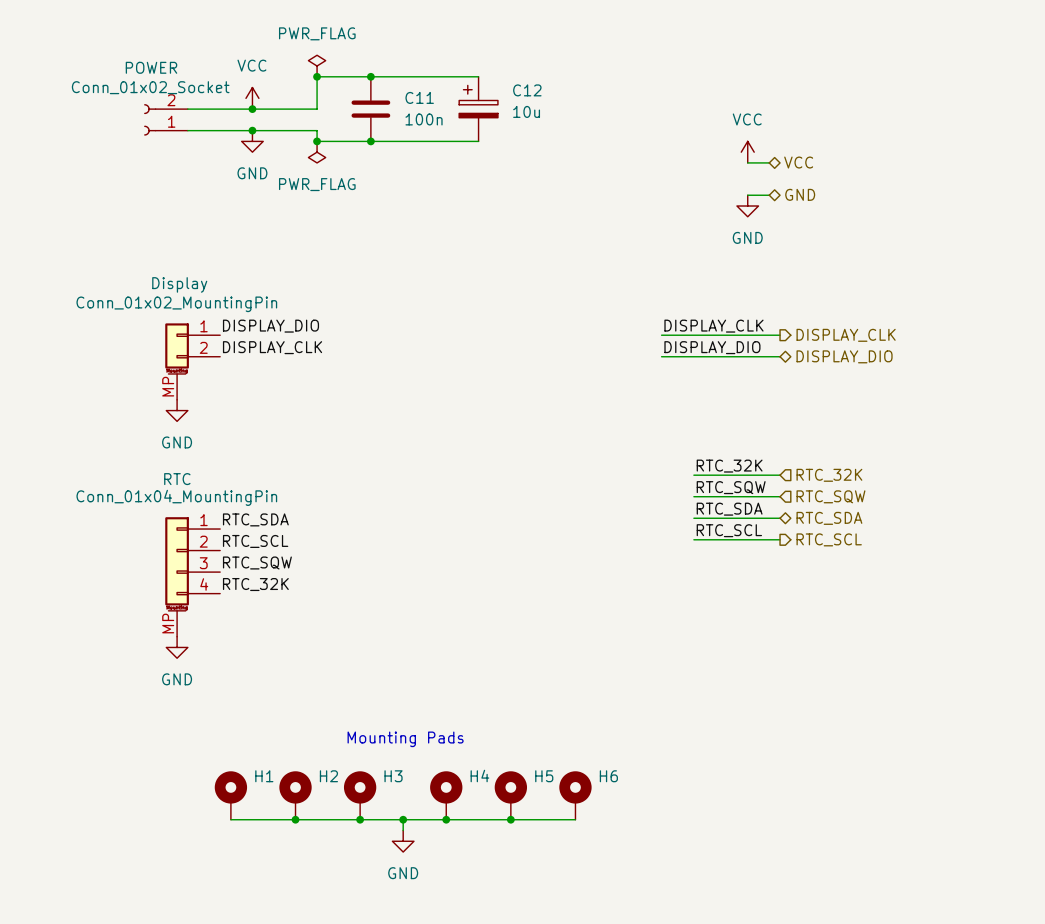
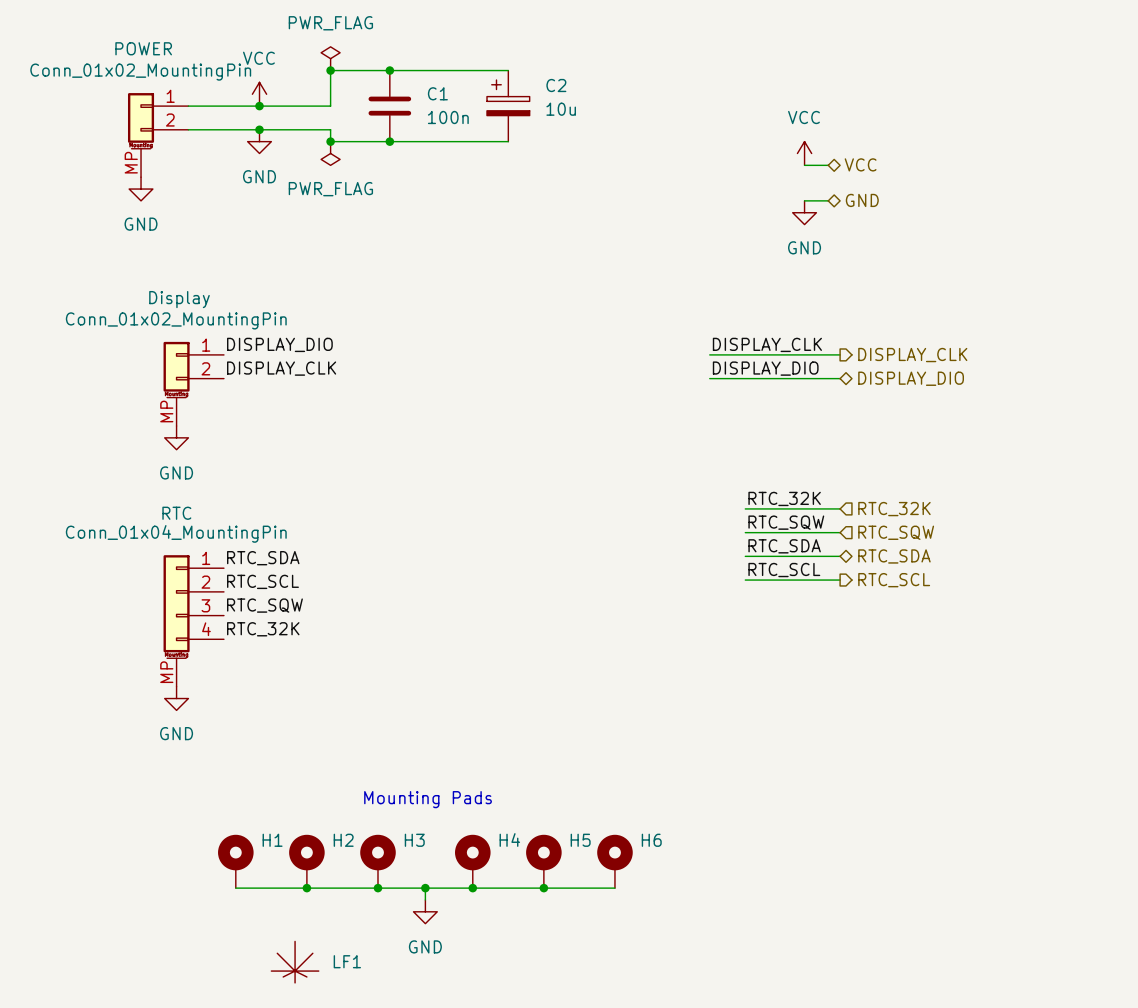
C12 name: C12 (527, 90) -> C2 (556, 85)
C11 name: C11 (419, 97) -> C1 (437, 93)
part: Conn_01x02_Socket (165, 119) -> none
part: none -> Conn_01x02_MountingPin (158, 135)
power symbol: none -> GND (141, 189)
LF1: none -> (295, 962)

